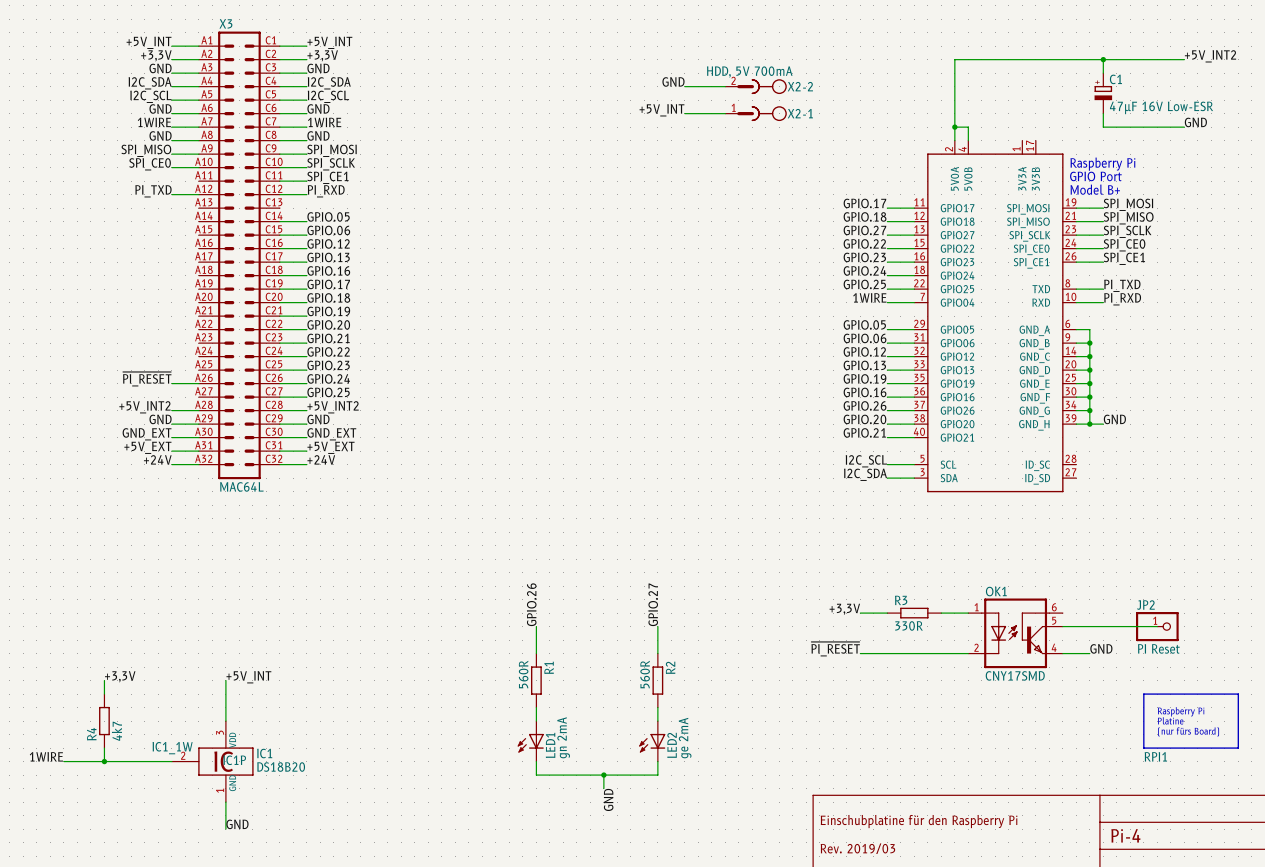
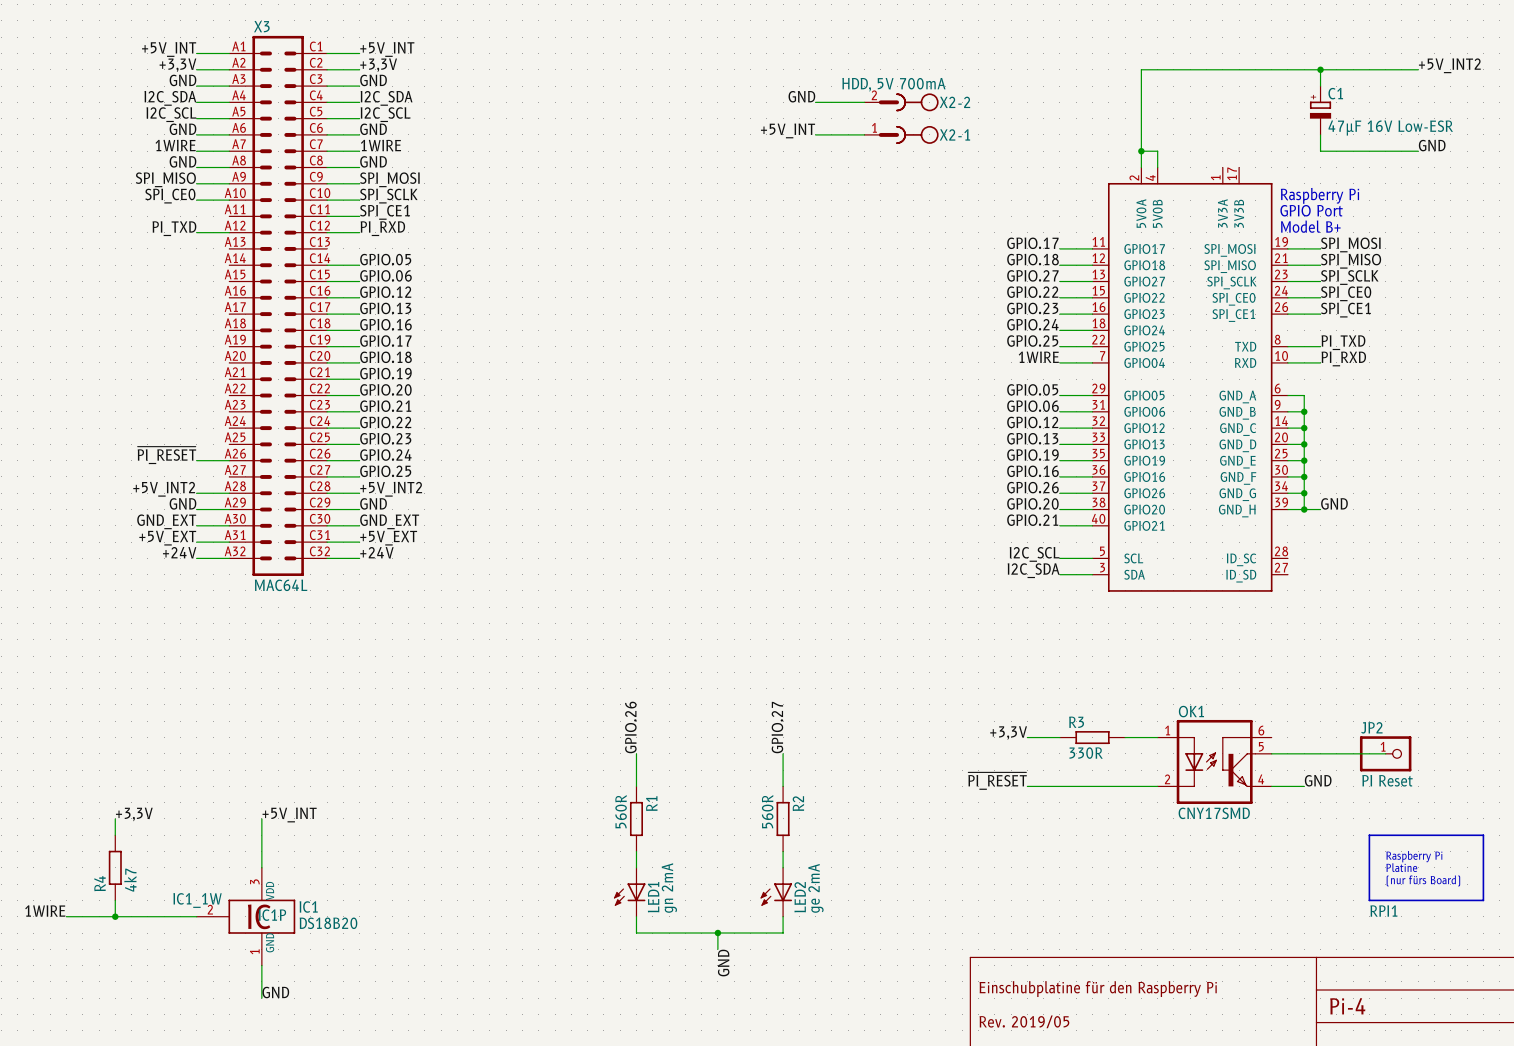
text: Rev. 2019/03 (857, 848) -> Rev. 2019/05 (1024, 1021)

